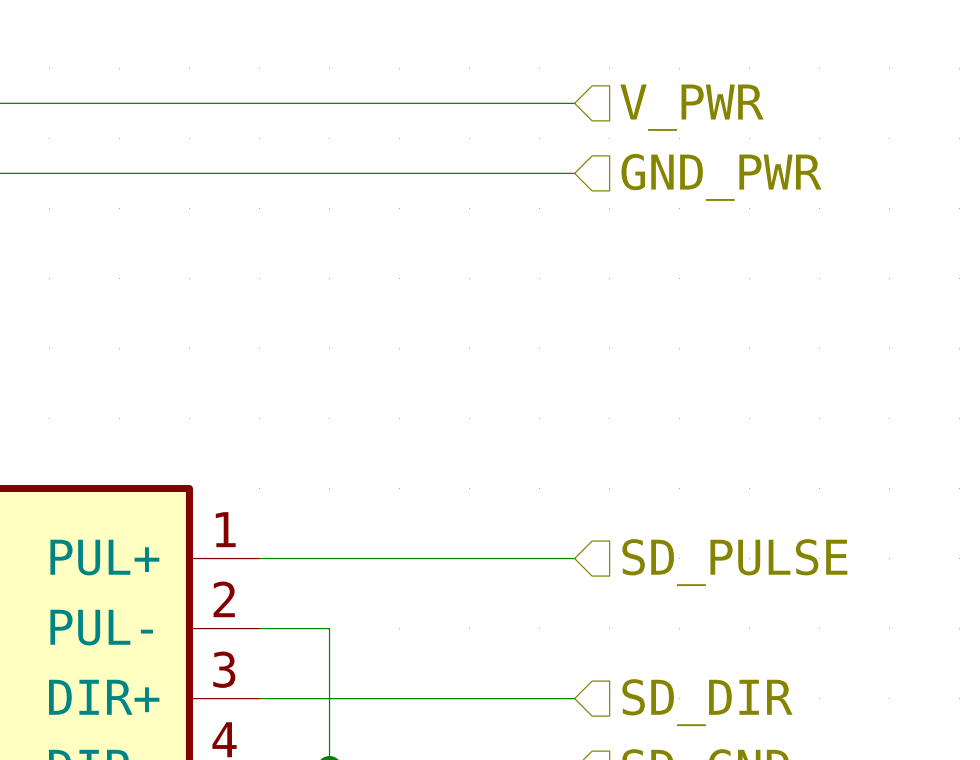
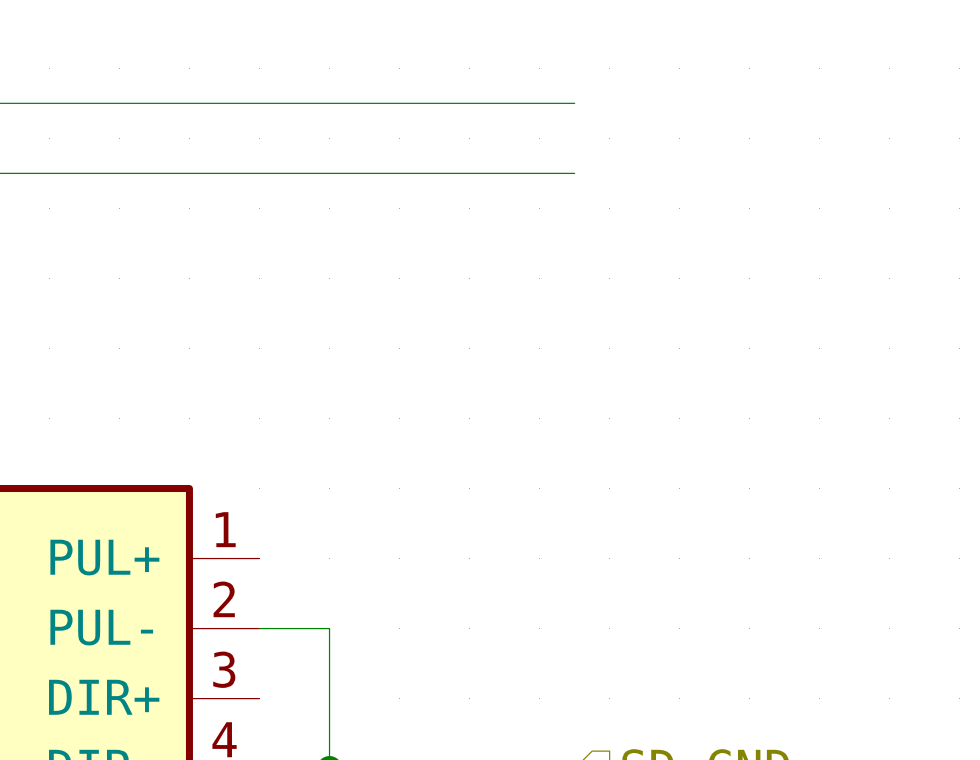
hierarchical label: V_PWR (692, 107) -> none
hierarchical label: GND_PWR (721, 177) -> none
wire: (259, 558) (574, 558) -> none
hierarchical label: SD_PULSE (734, 562) -> none
wire: (259, 698) (574, 698) -> none
hierarchical label: SD_DIR (707, 702) -> none

